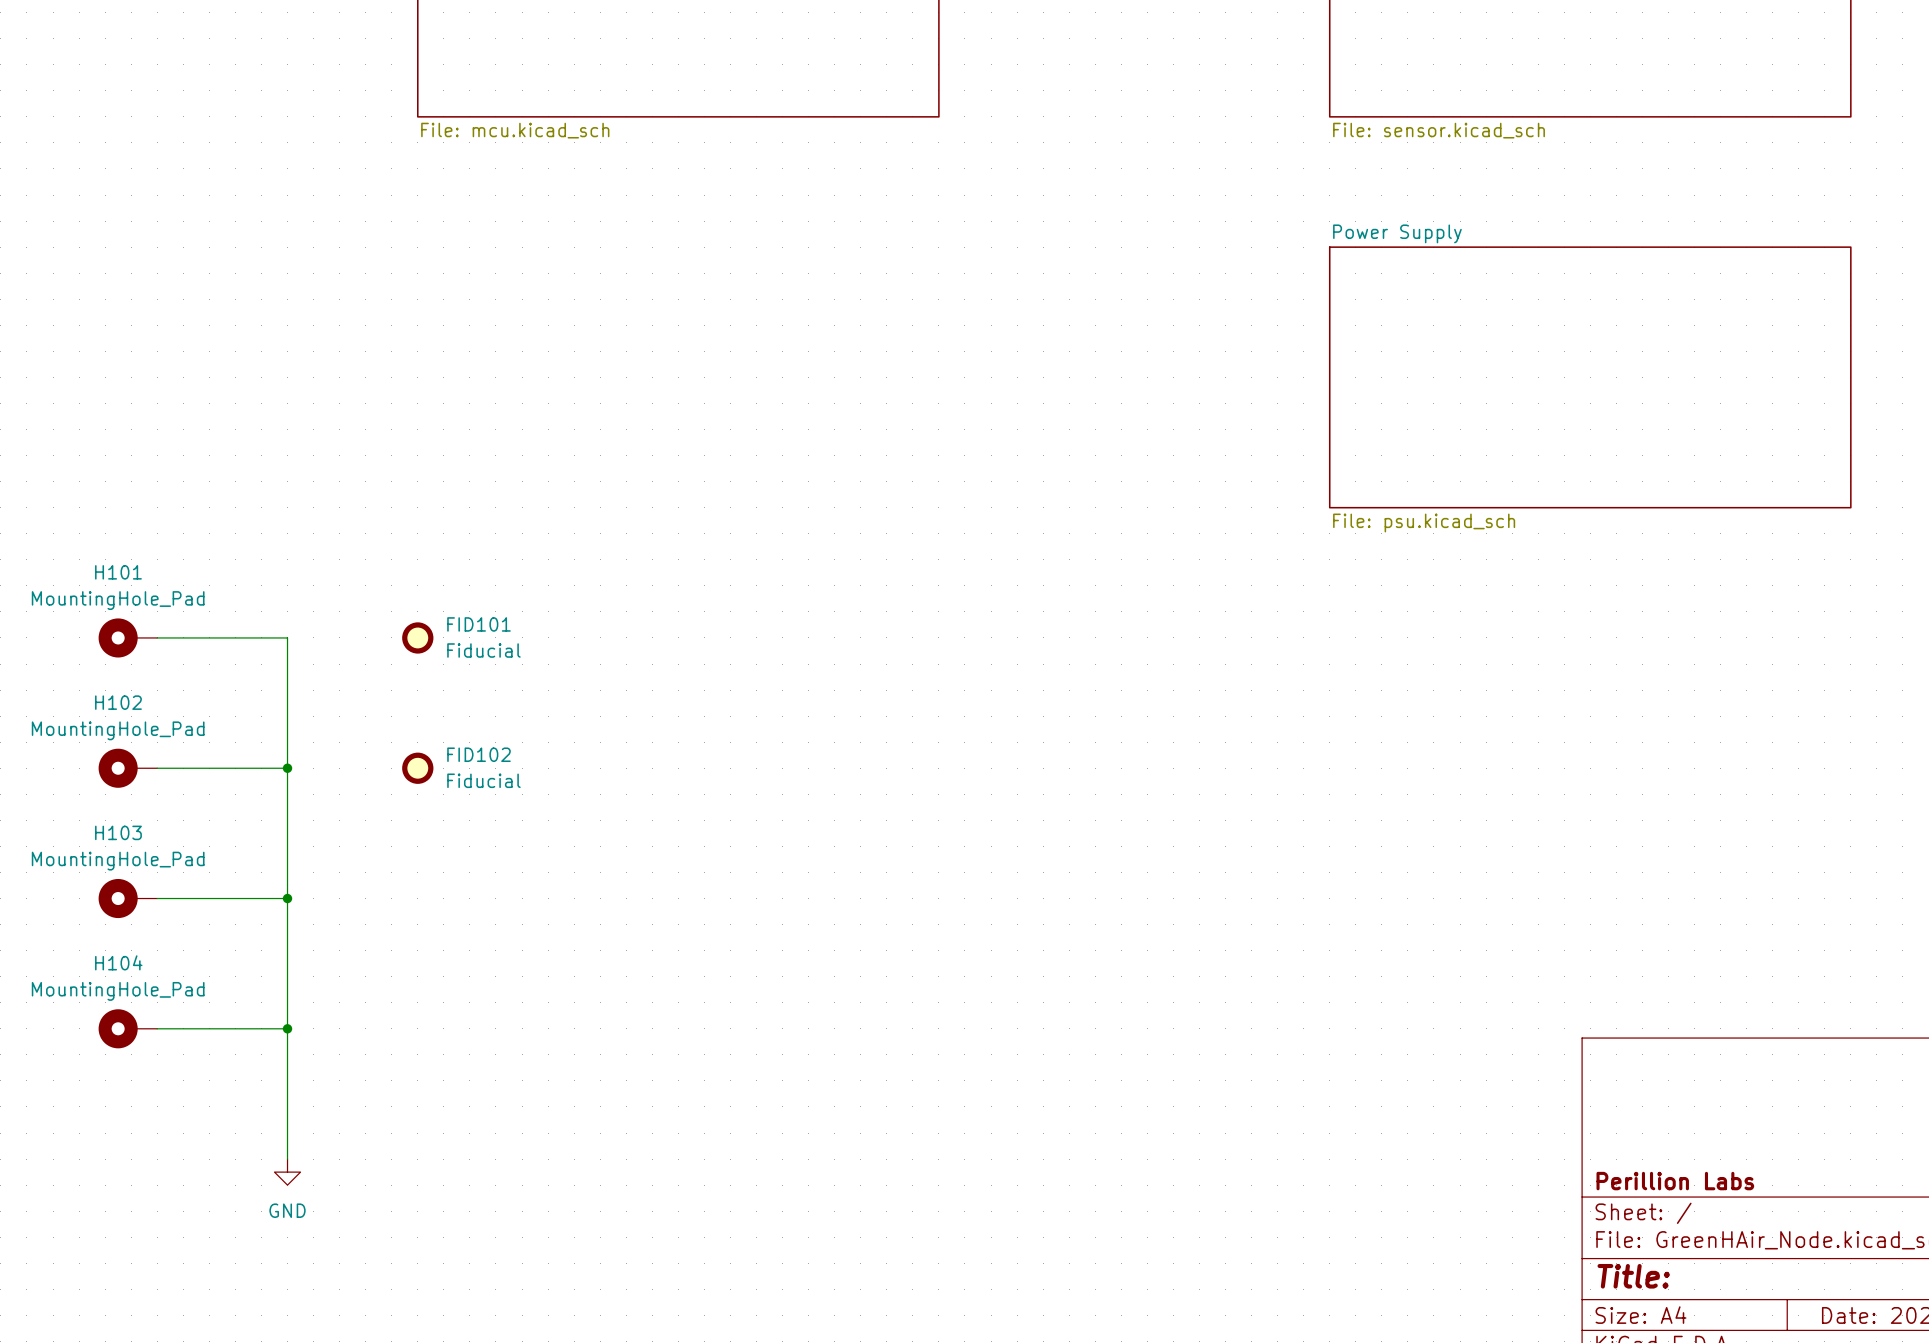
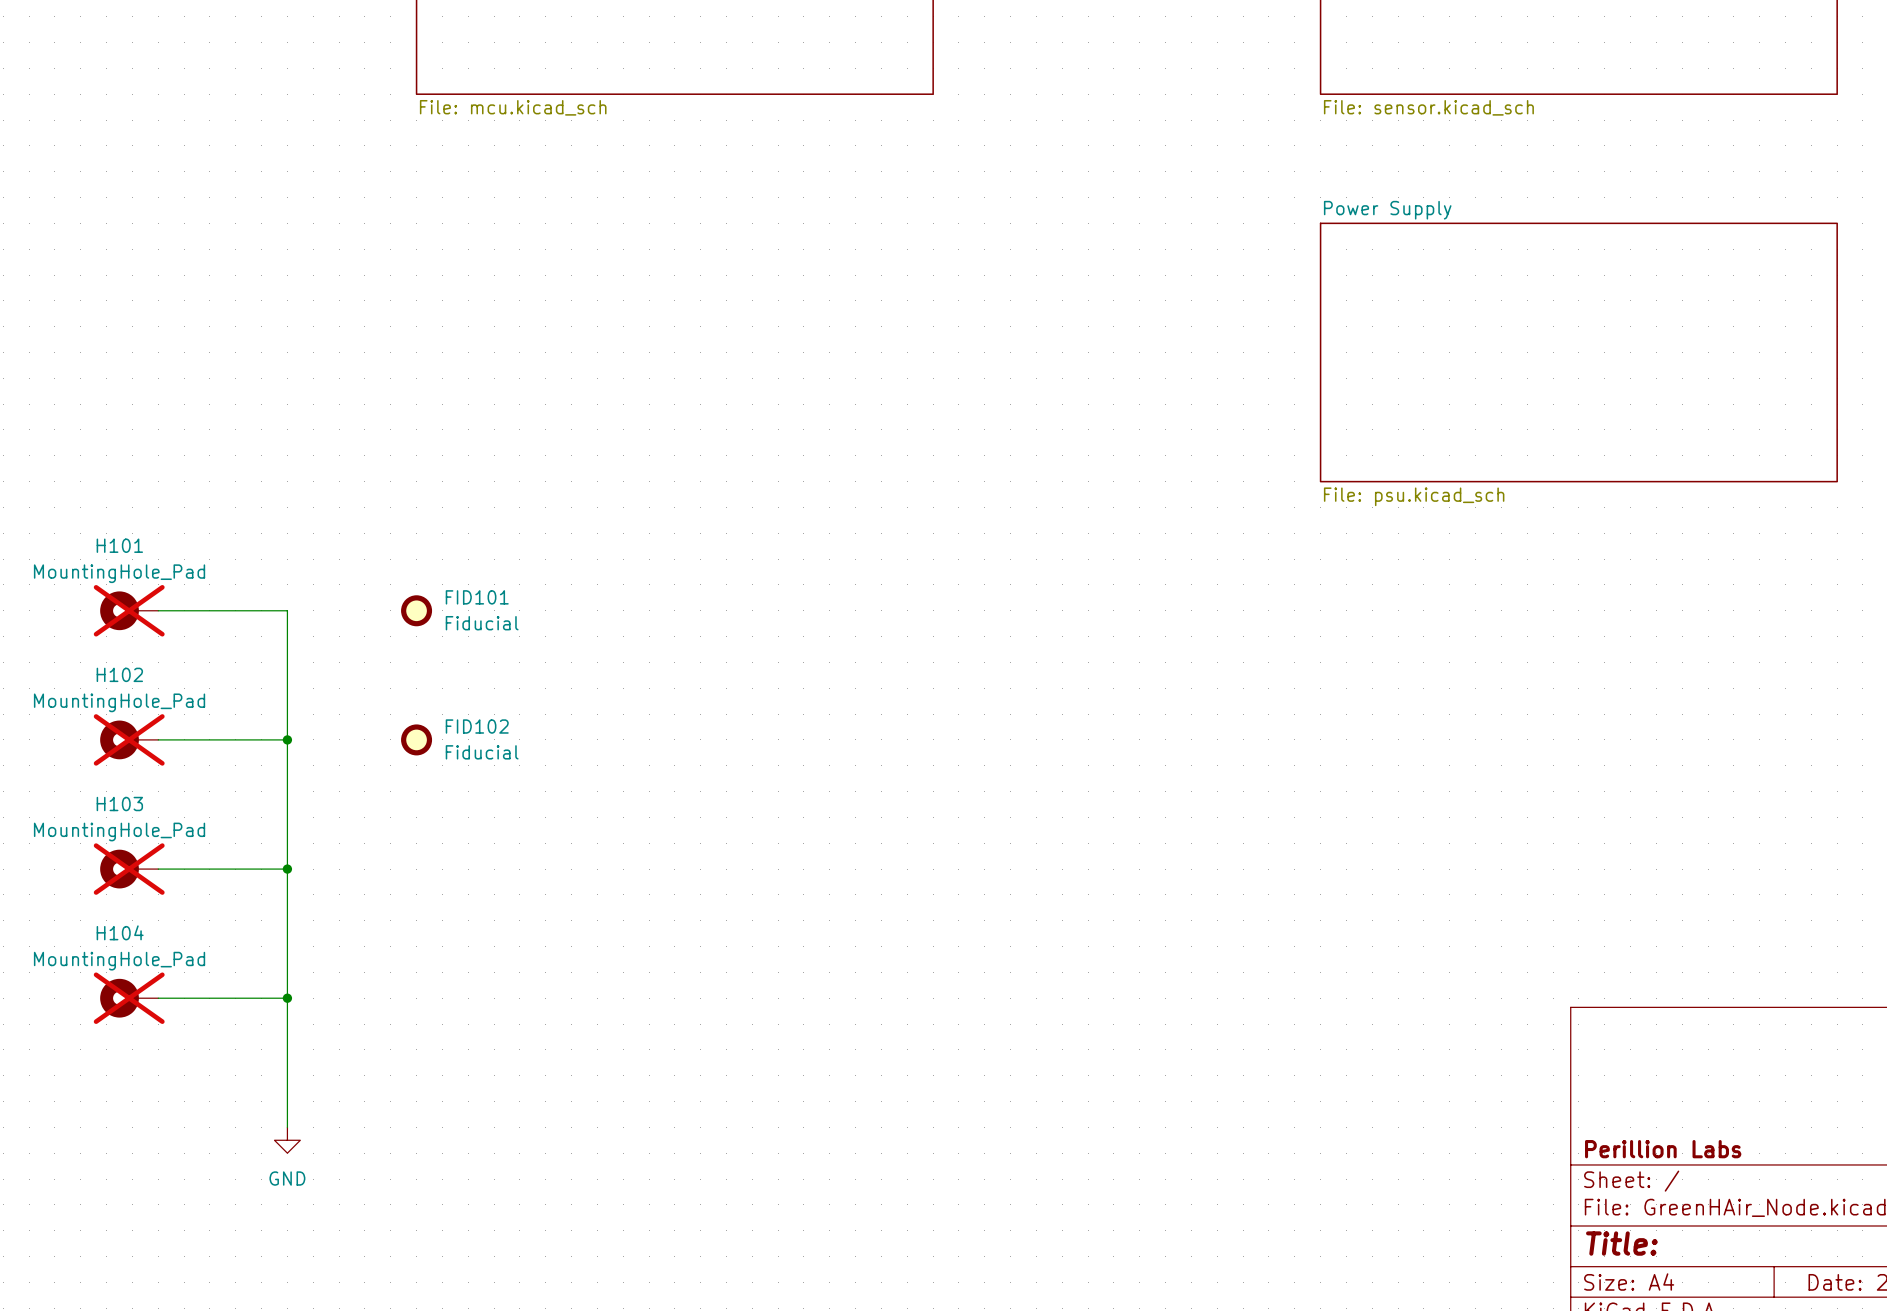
H101 do-not-place cross: none -> (129, 610)
H102 do-not-place cross: none -> (129, 739)
H103 do-not-place cross: none -> (129, 869)
H104 do-not-place cross: none -> (129, 998)

